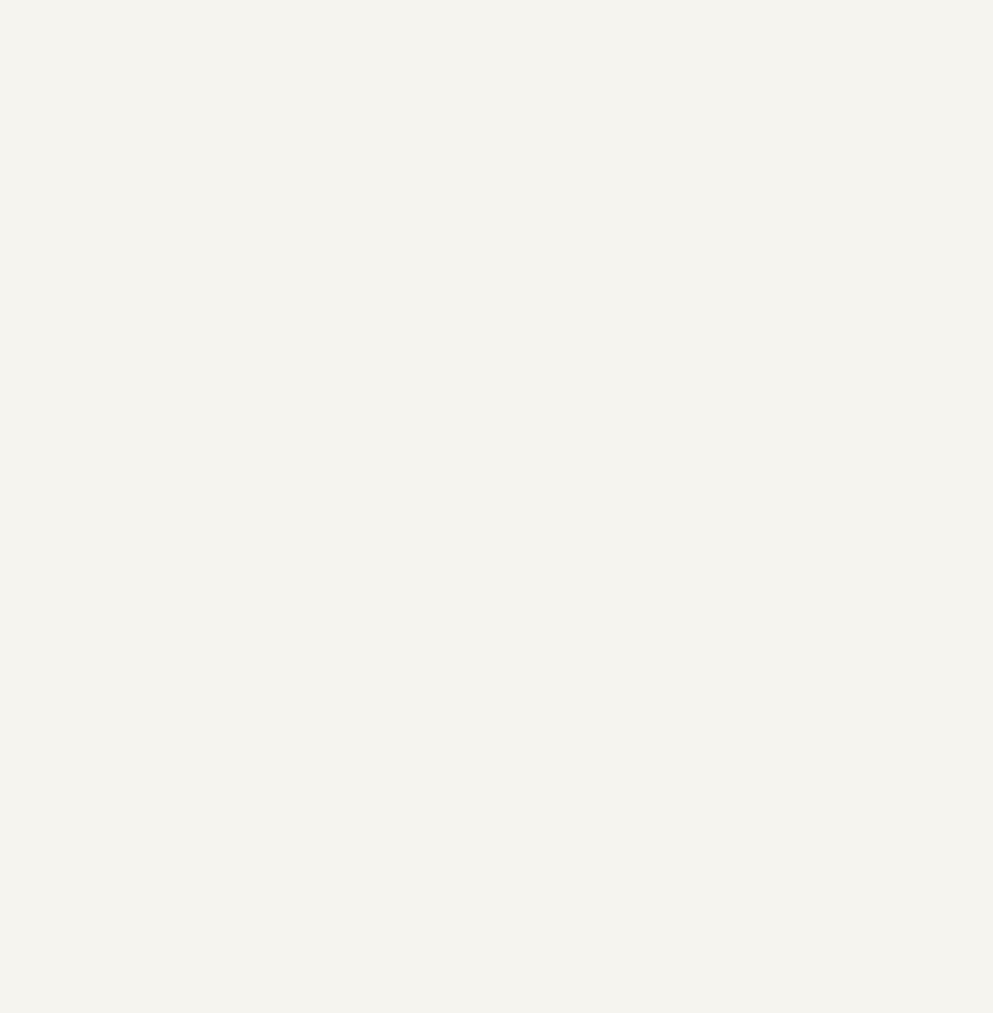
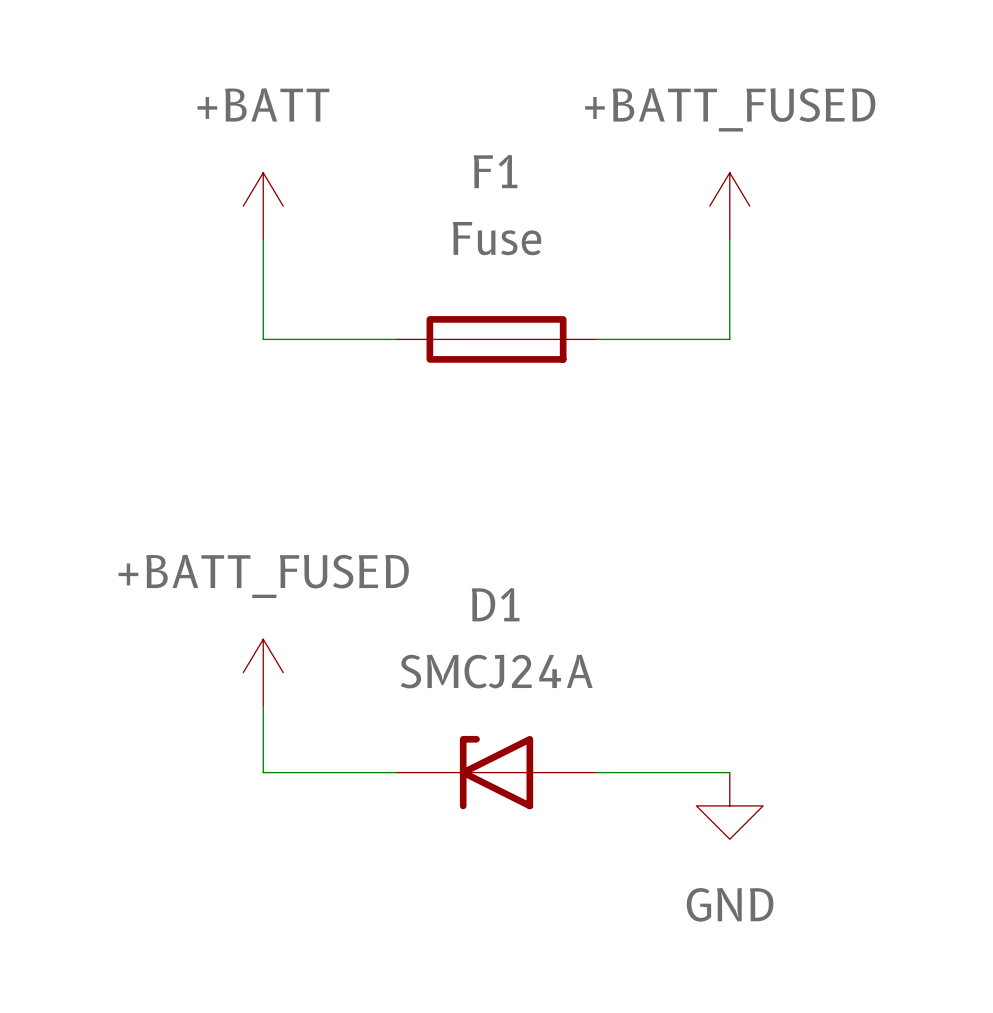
power symbol: none -> +BATT (263, 206)
power symbol: none -> +BATT_FUSED (729, 206)
wire: none -> (263, 239) (263, 339) (396, 339)
wire: none -> (729, 239) (729, 339) (596, 339)
F1: none -> Fuse (496, 339)
power symbol: none -> +BATT_FUSED (263, 672)
wire: none -> (263, 705) (263, 772) (396, 772)
D1: none -> SMCJ24A (496, 772)
wire: none -> (596, 772) (729, 772)
power symbol: none -> GND (729, 805)

